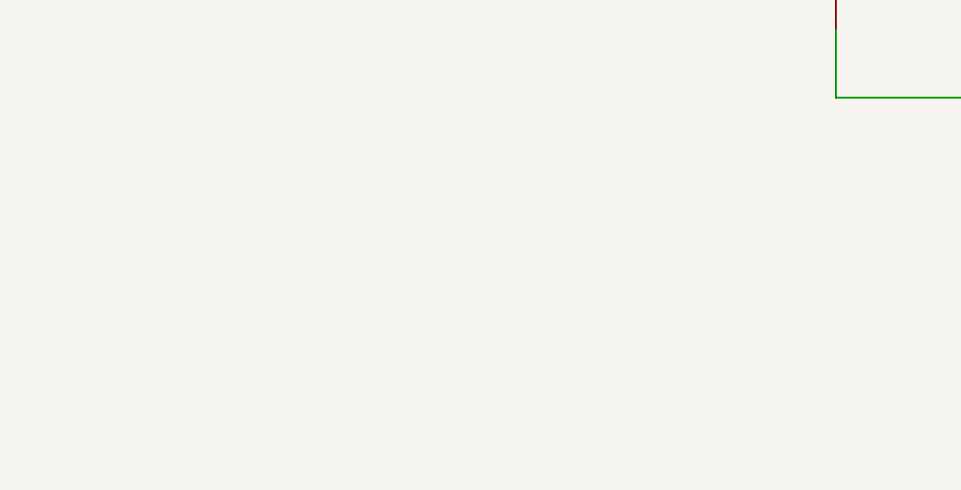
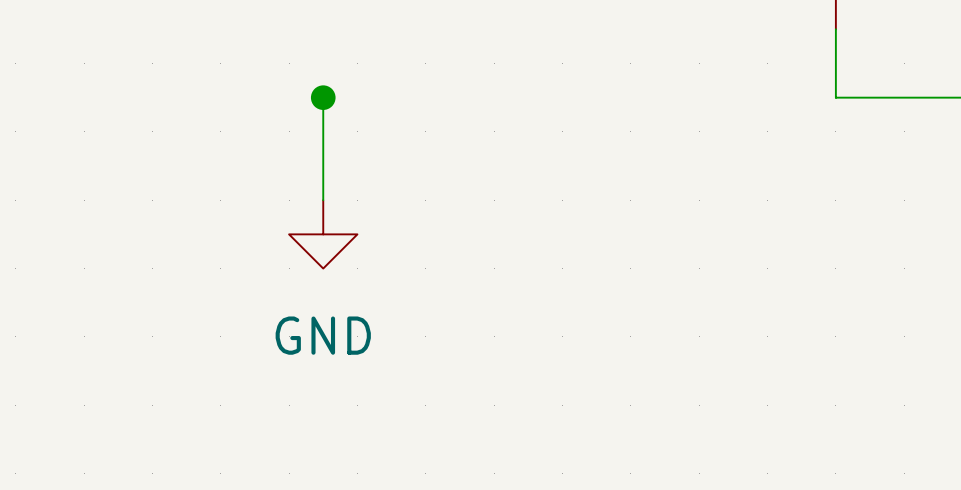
wire: none -> (323, 97) (323, 200)
junction: none -> (323, 97)
power symbol: none -> GND (323, 234)

